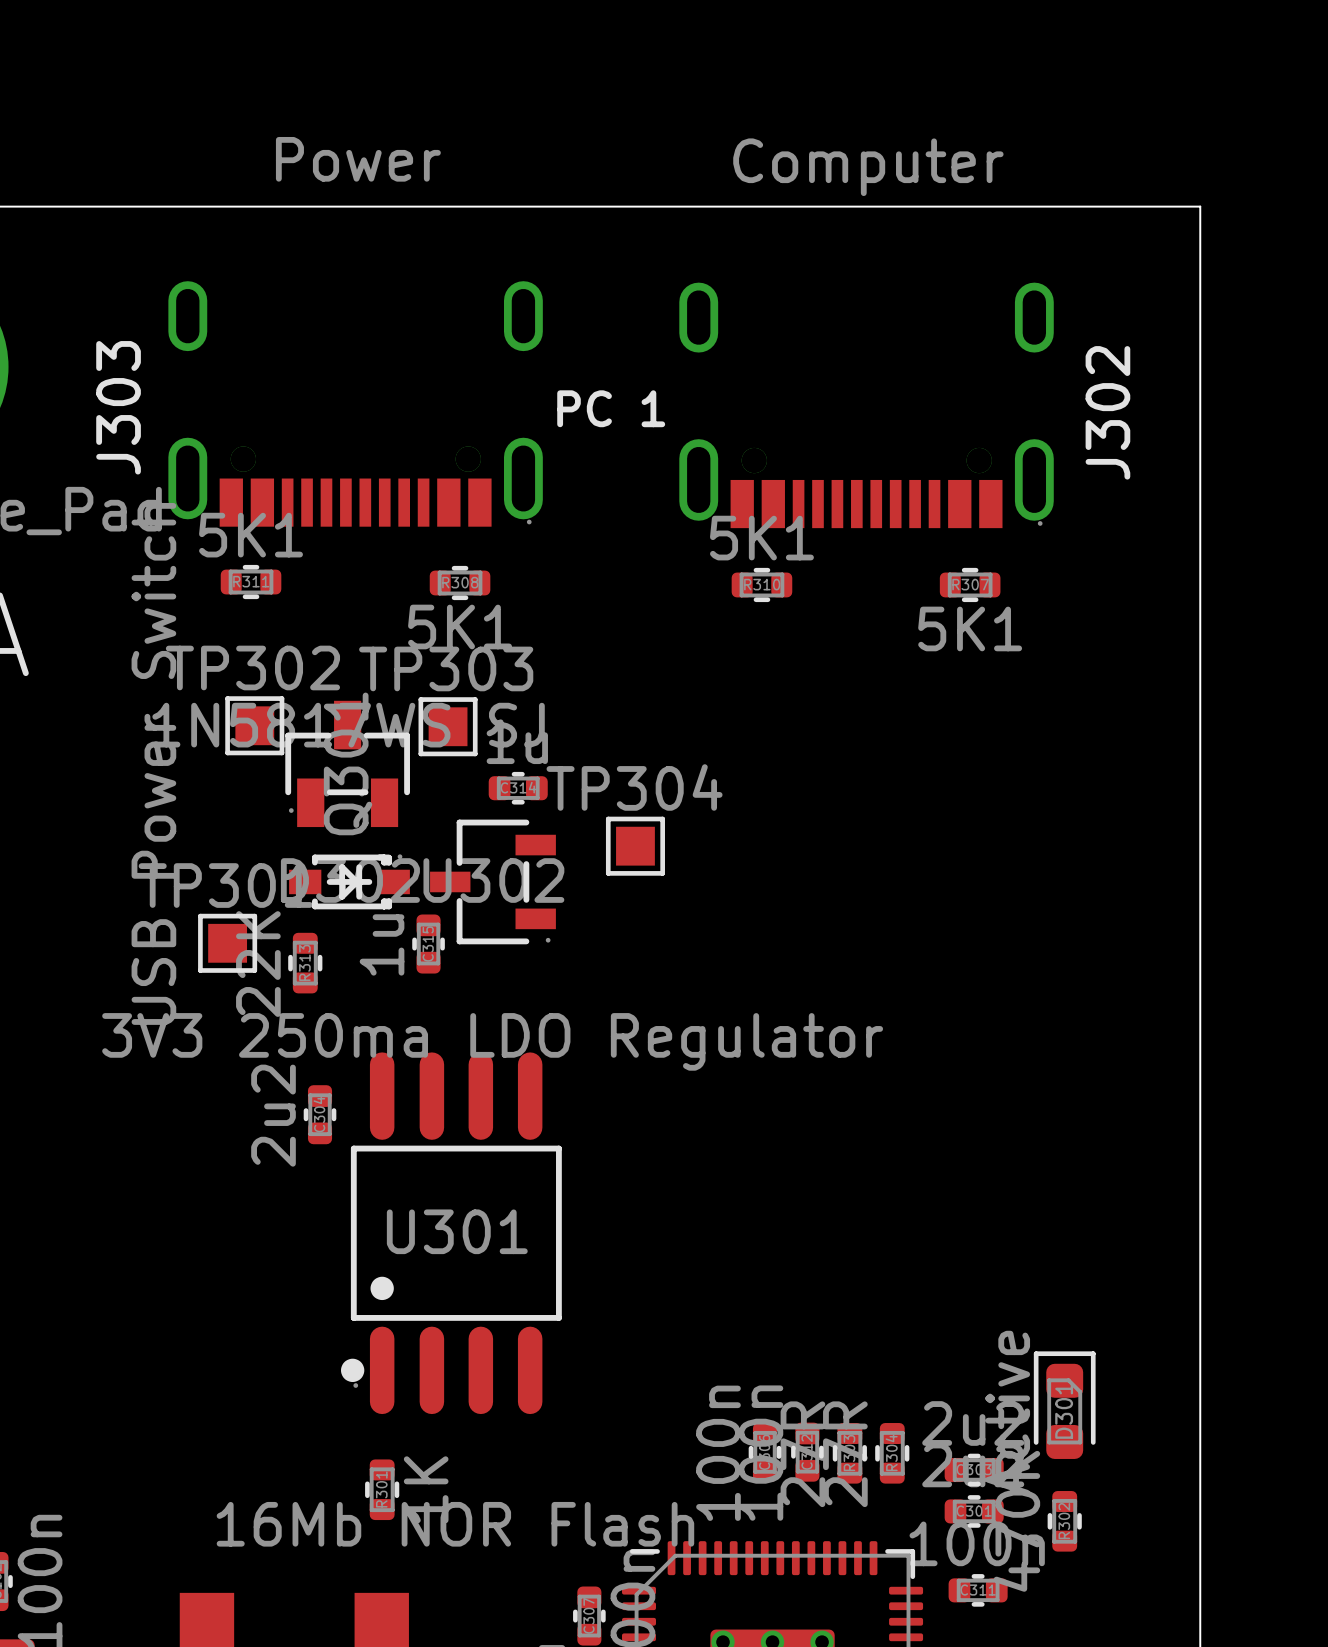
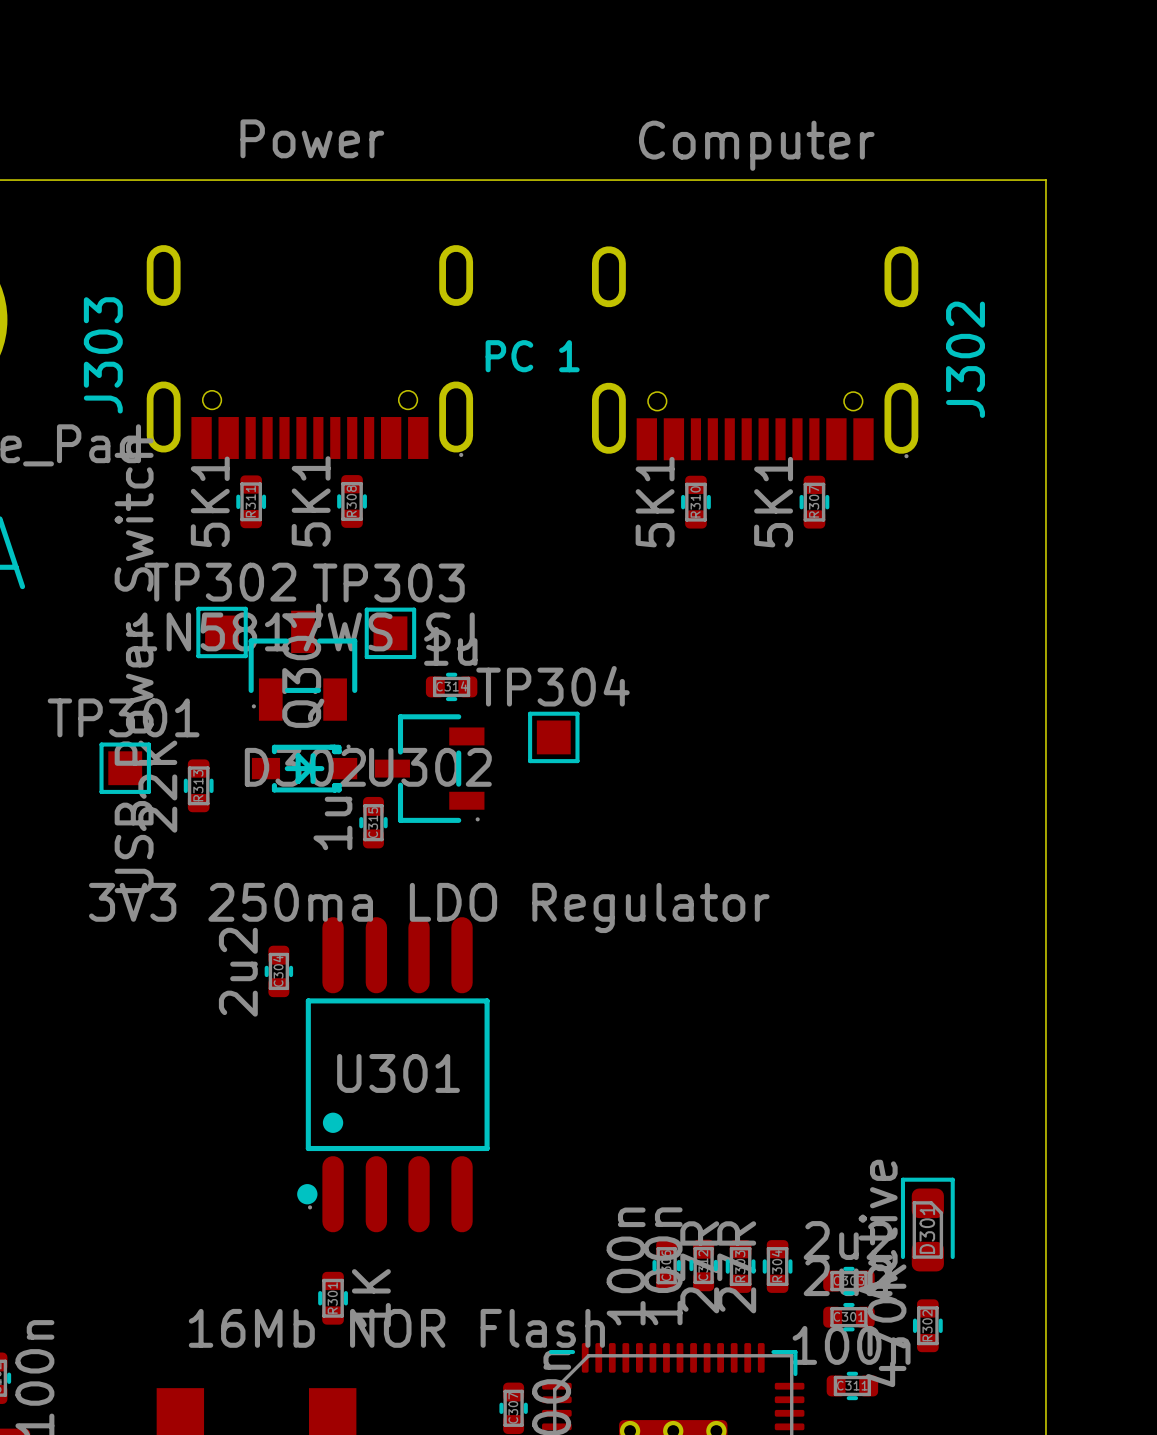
J303 footprint: [168, 281, 543, 527] -> [146, 245, 474, 459]
J302 footprint: [679, 282, 1054, 529] -> [591, 246, 919, 461]
R311 rotation: 0° (251, 582) -> 90° clockwise (251, 501)
R311 position: (251, 582) -> (251, 501)
R308 rotation: 0° (460, 583) -> 90° clockwise (352, 501)
R308 position: (460, 583) -> (352, 501)
R310 rotation: 0° (761, 584) -> 90° clockwise (695, 502)
R310 position: (761, 584) -> (695, 502)
R307 rotation: 0° (970, 584) -> 90° clockwise (814, 502)
R307 position: (970, 584) -> (814, 502)
TP301 position: (227, 943) -> (125, 768)
R313 position: (305, 963) -> (198, 785)

